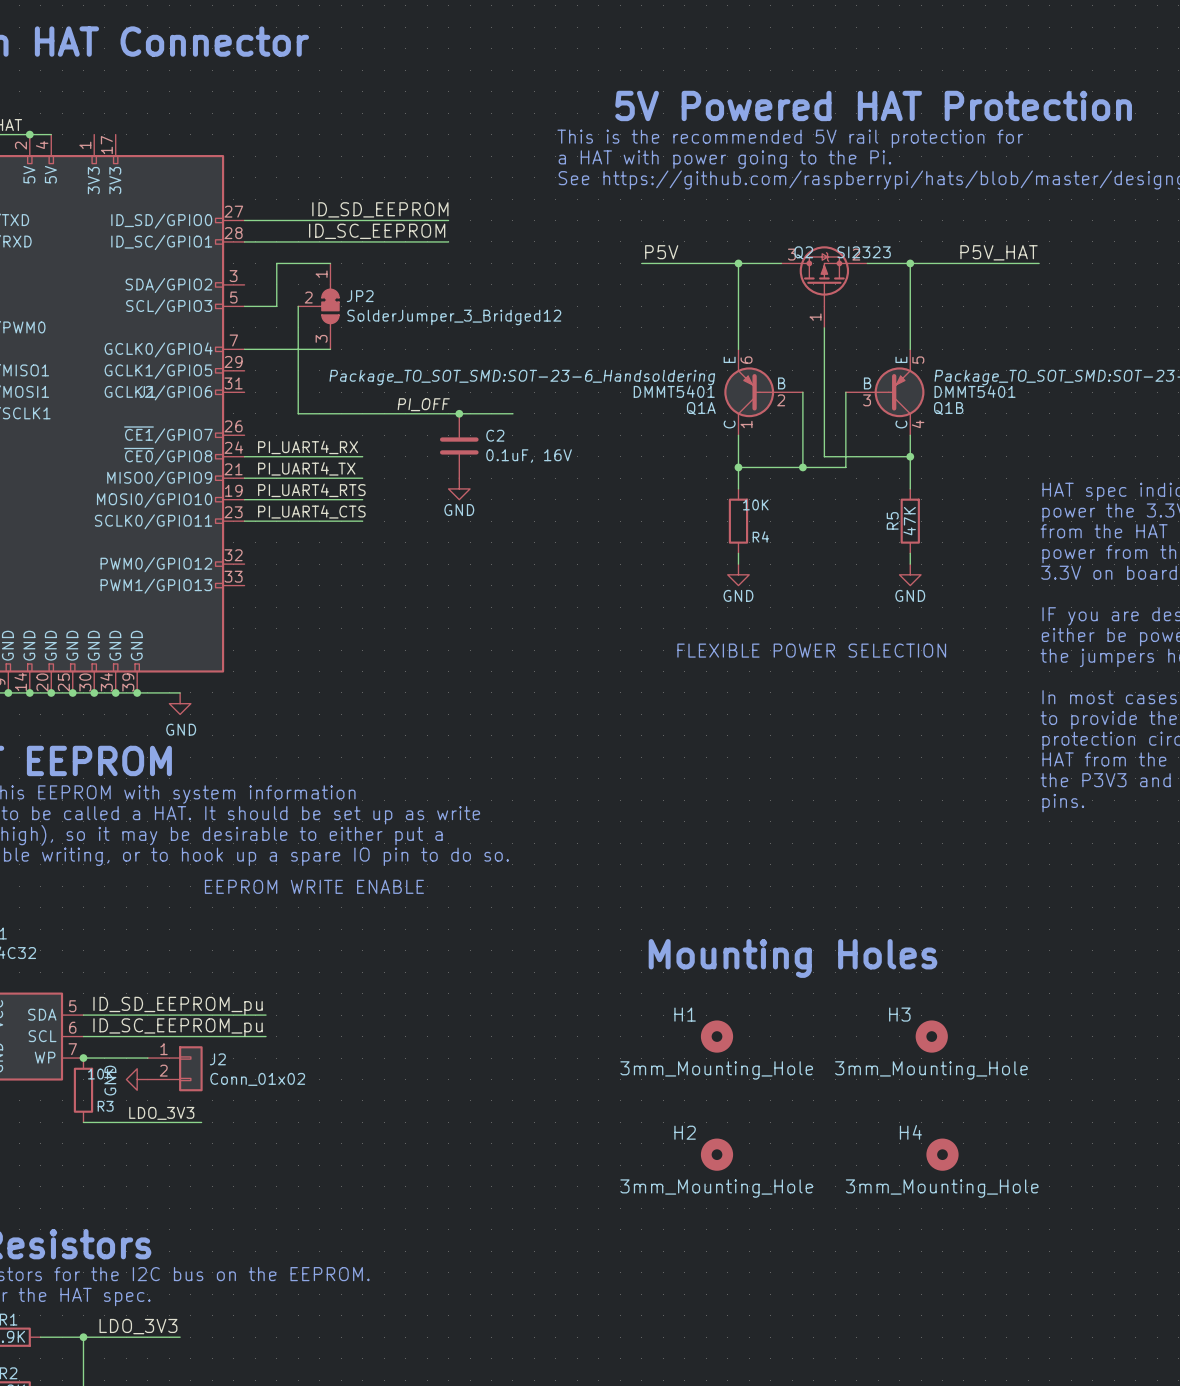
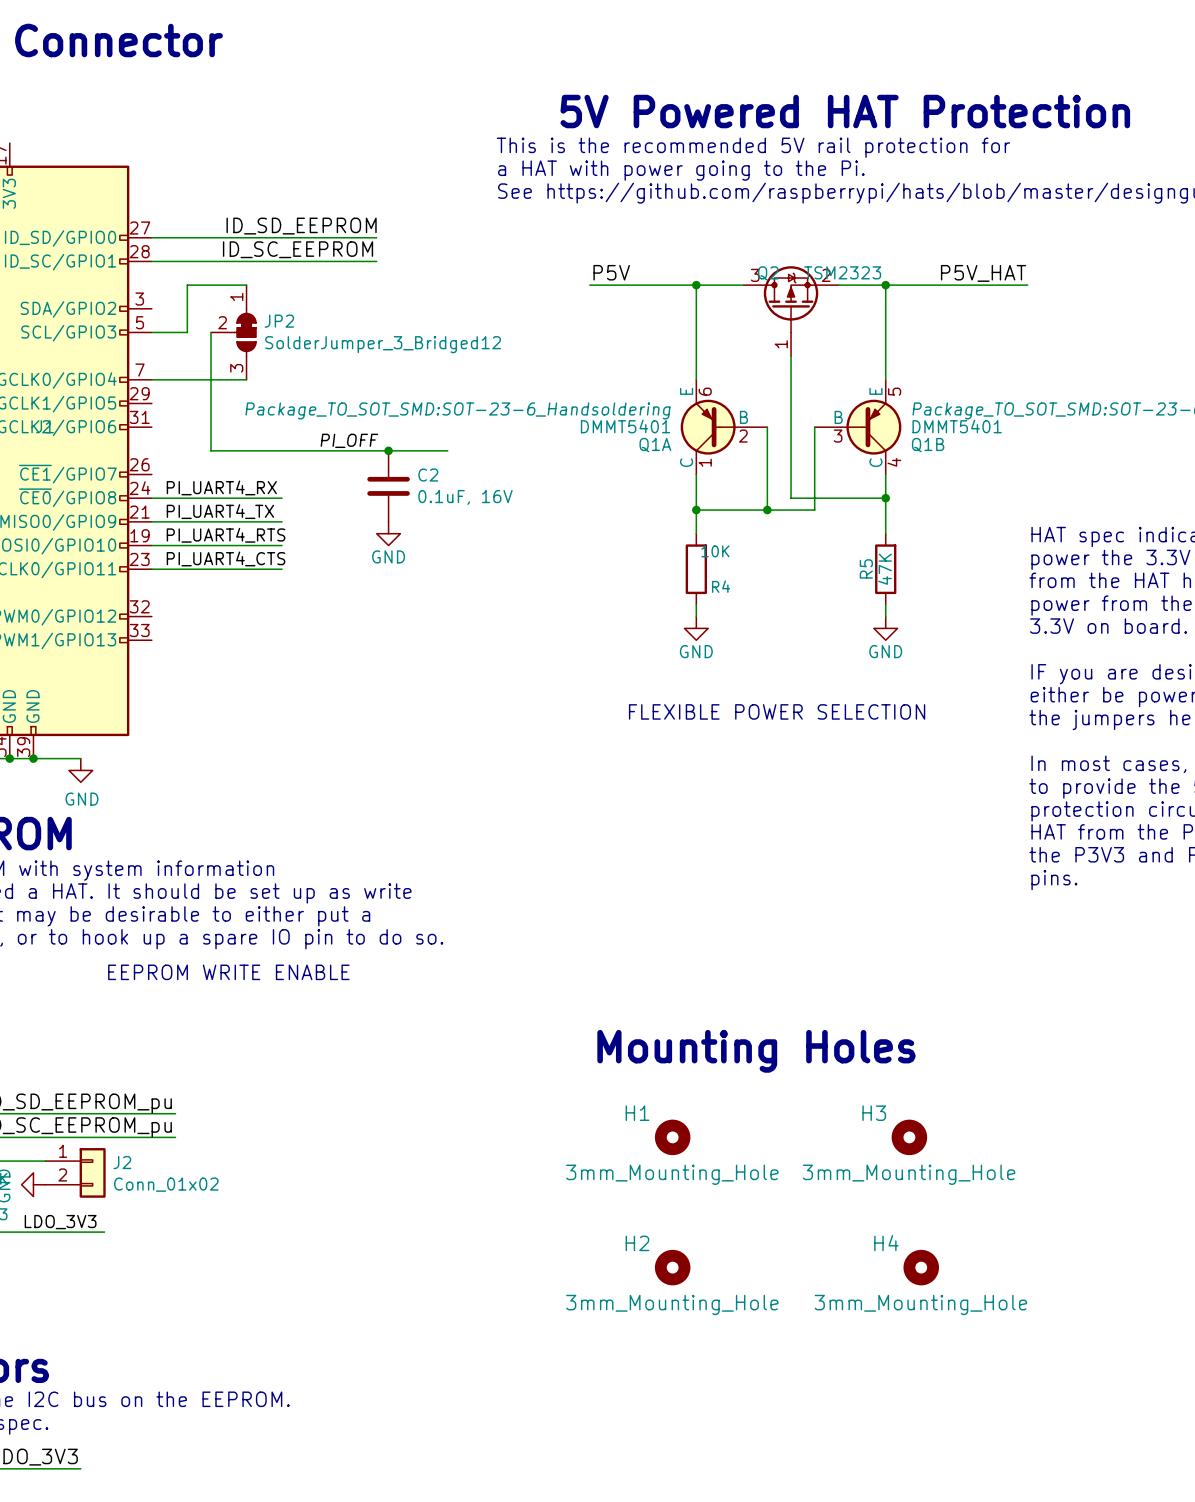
Q2 value: SI2323 (864, 252) -> TSM2323 (842, 272)

